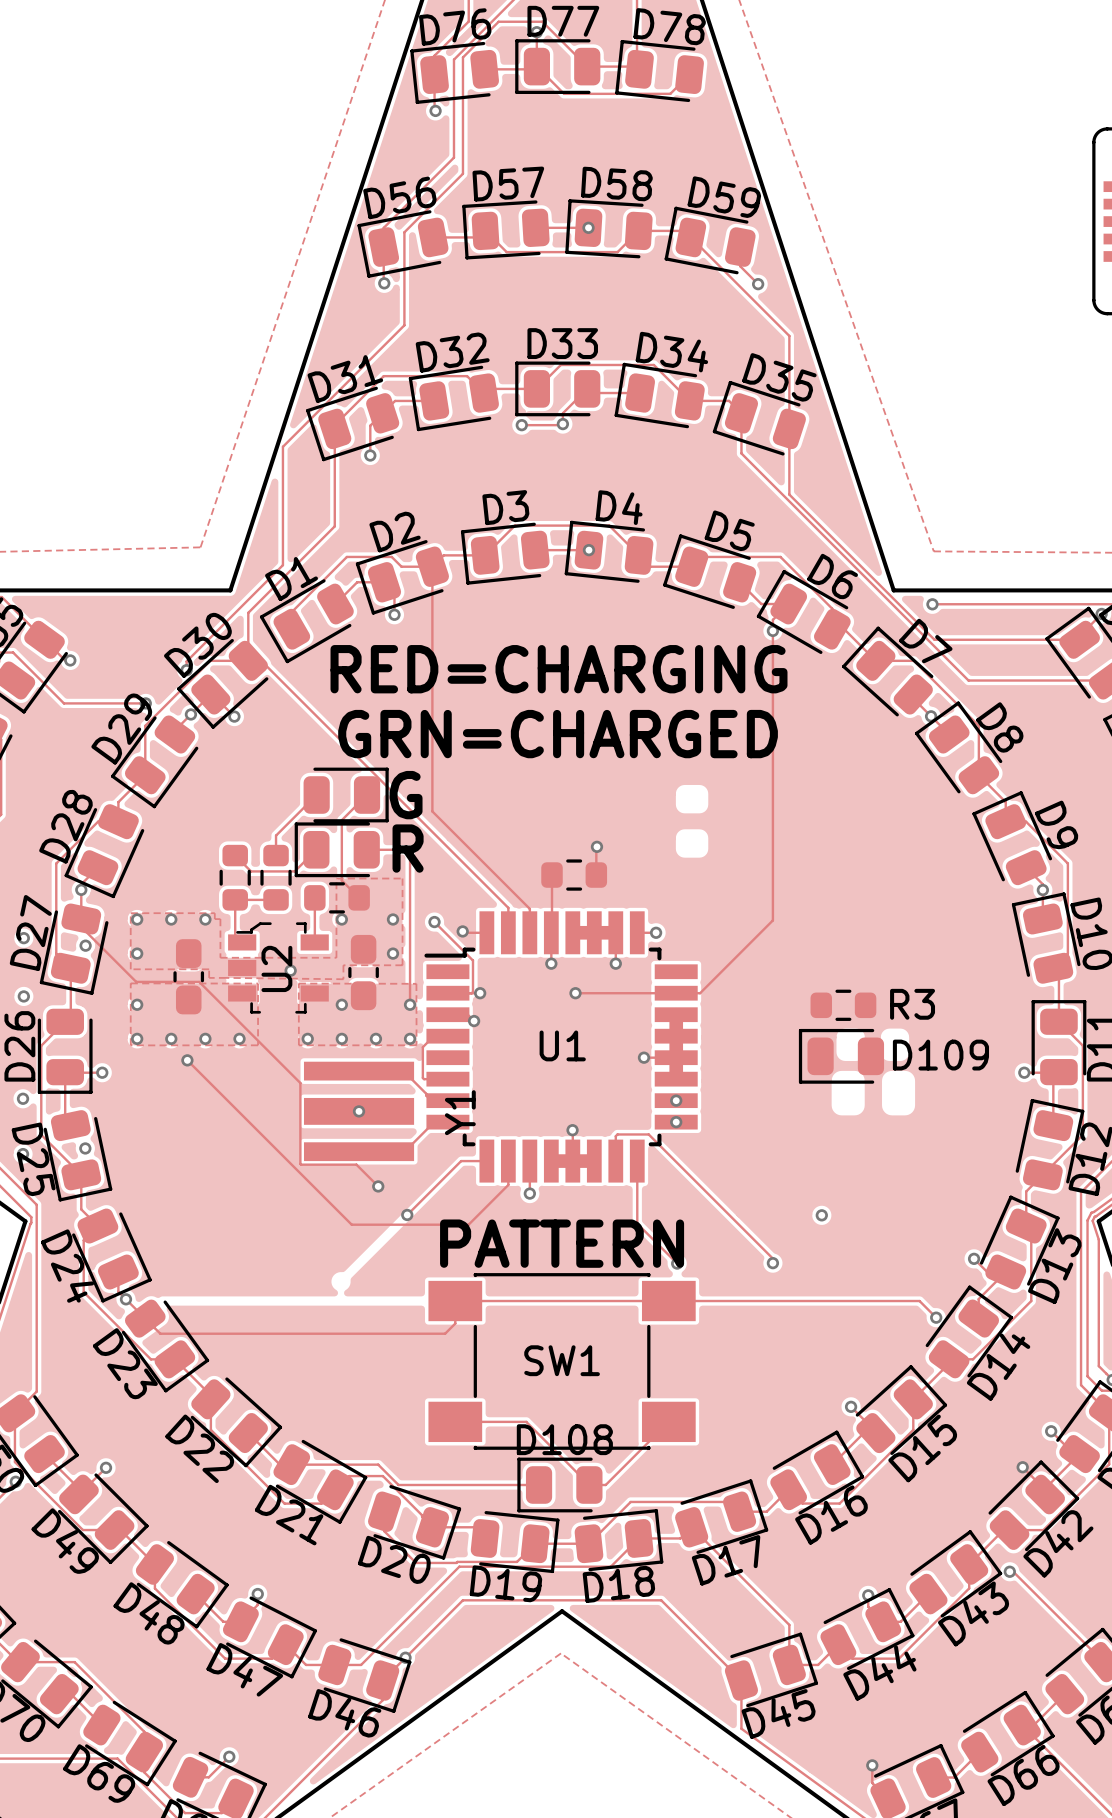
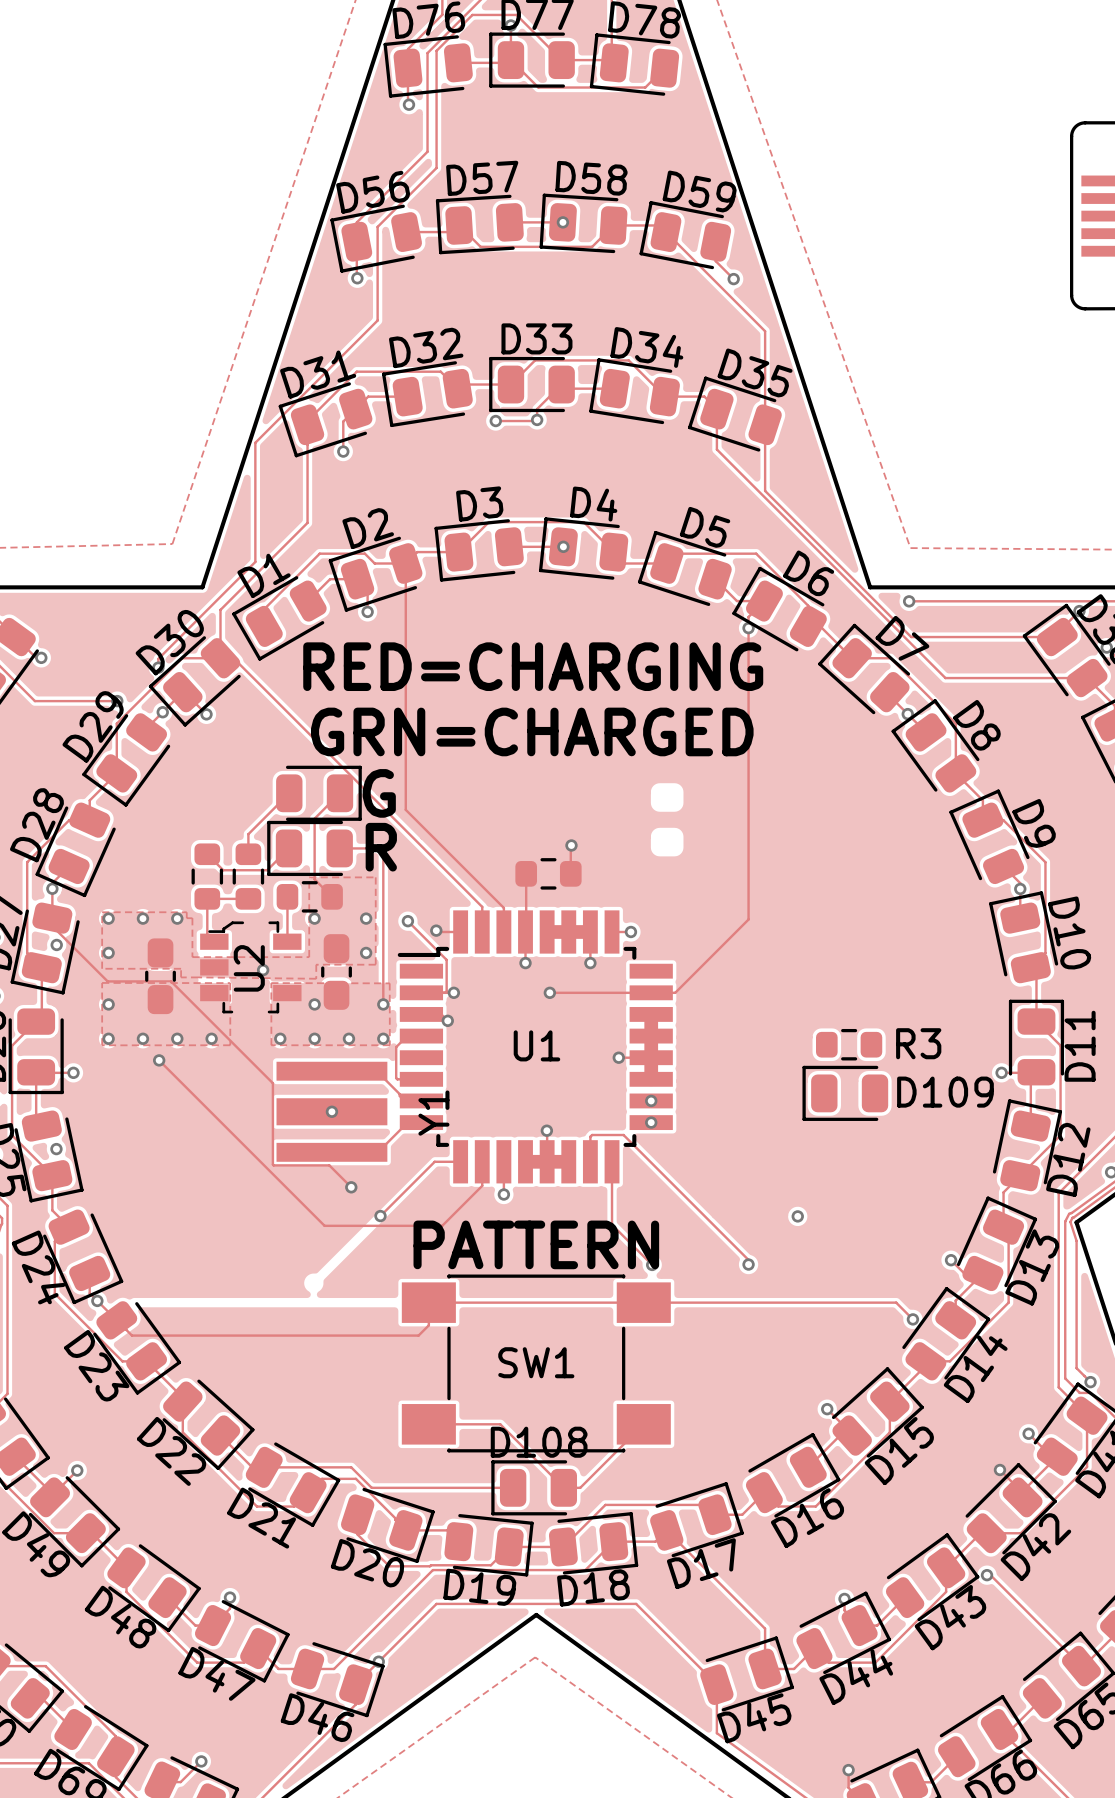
R3 position: (843, 1005) -> (849, 1044)
D109 position: (841, 1056) -> (845, 1093)

